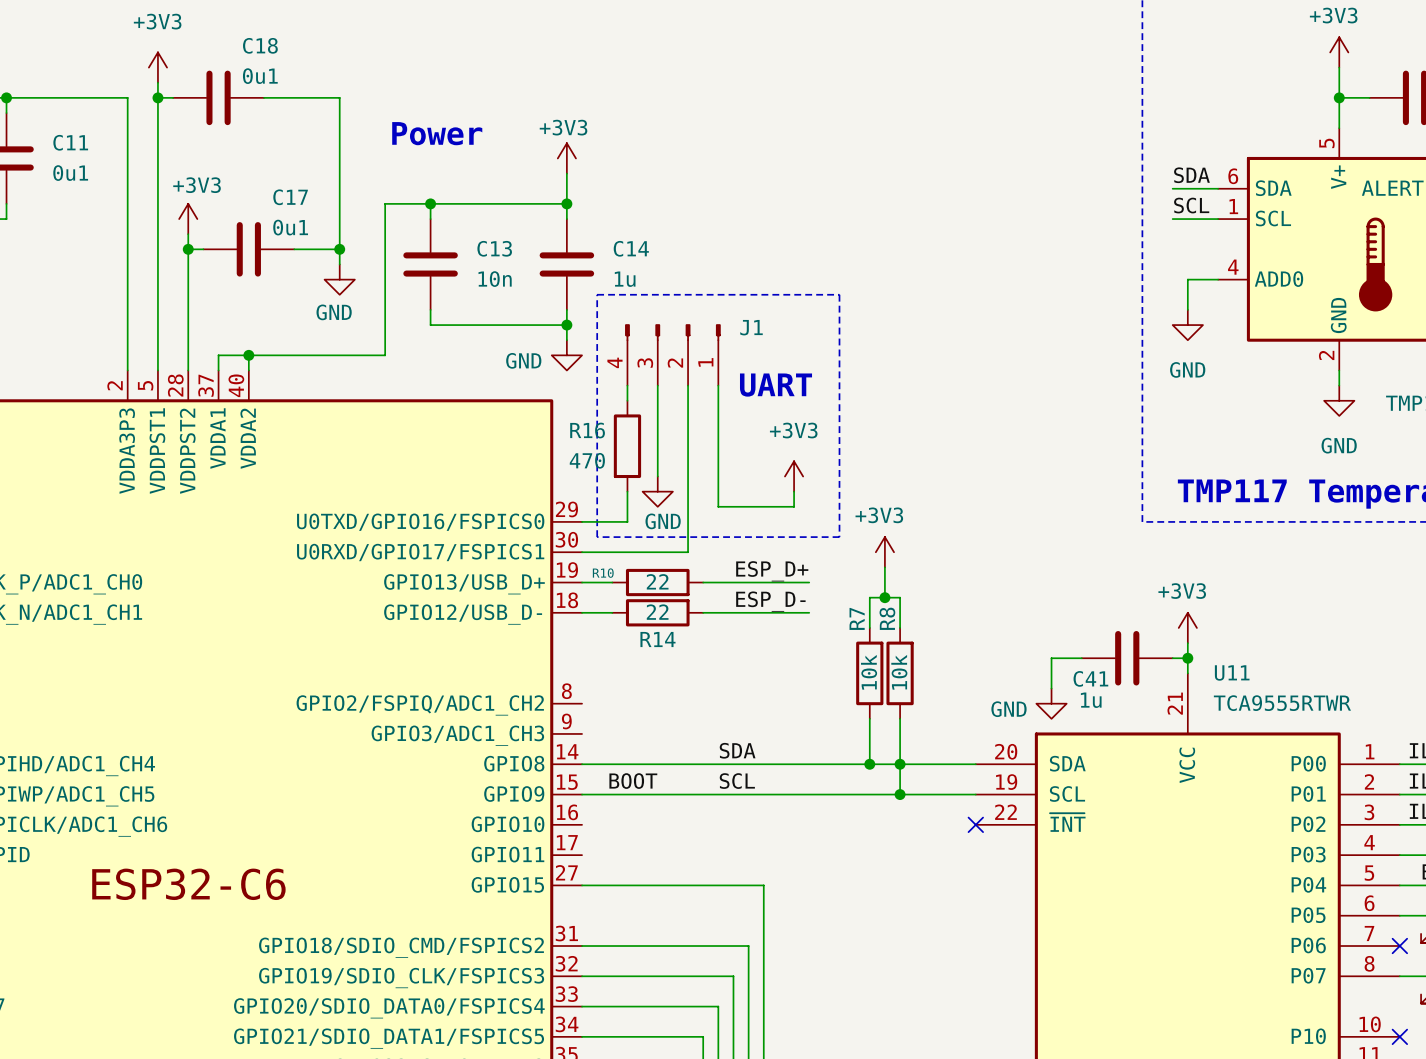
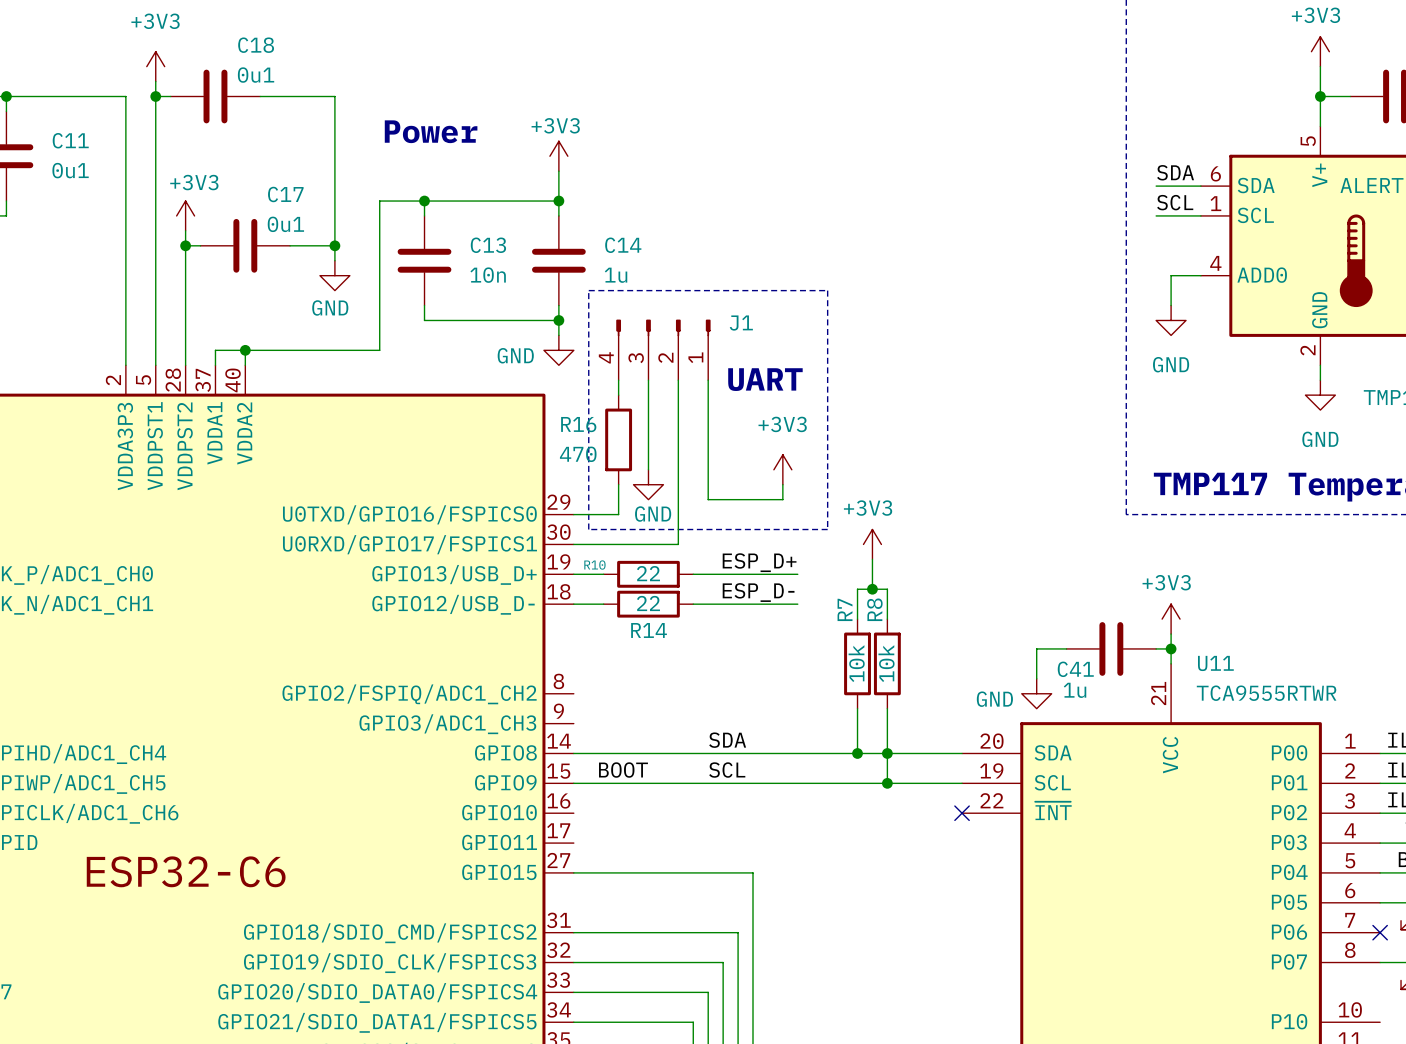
no-connect mark: (1399, 1036) -> none

